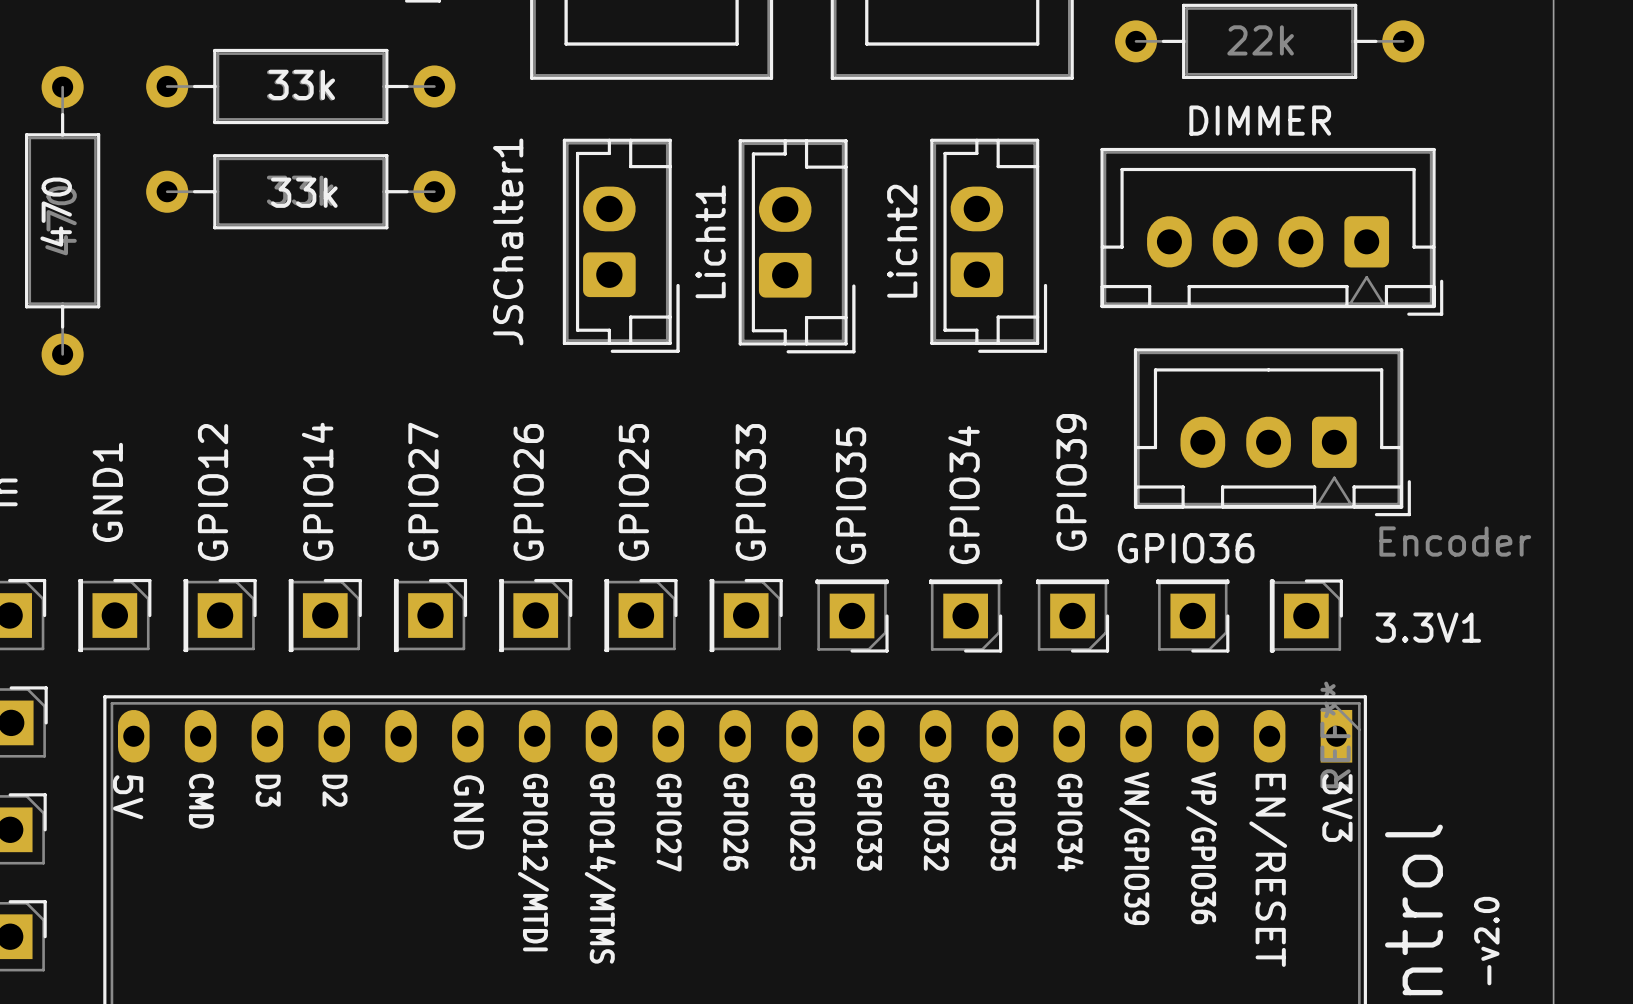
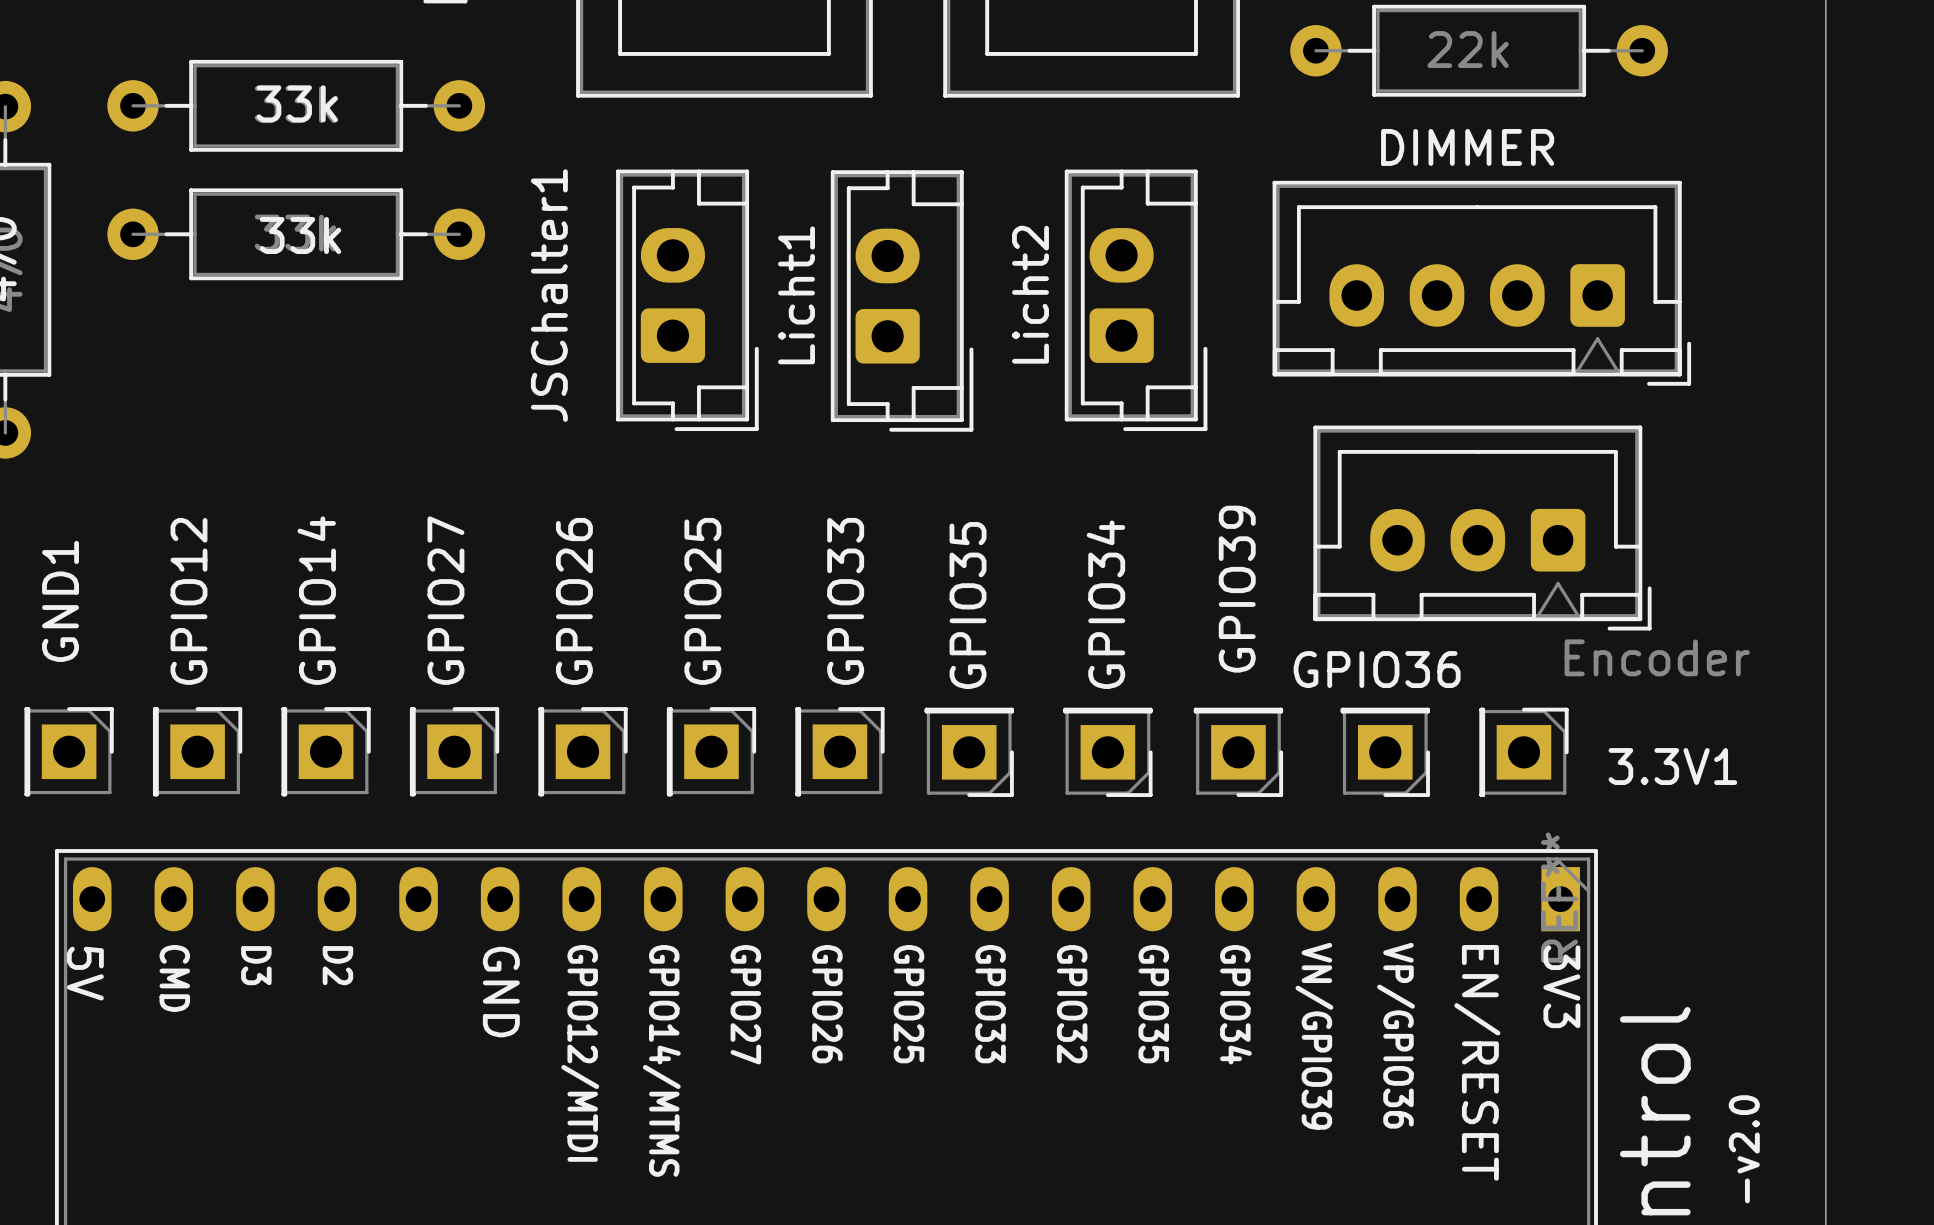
part value position: Encoder (1455, 541) -> Encoder (1657, 657)

